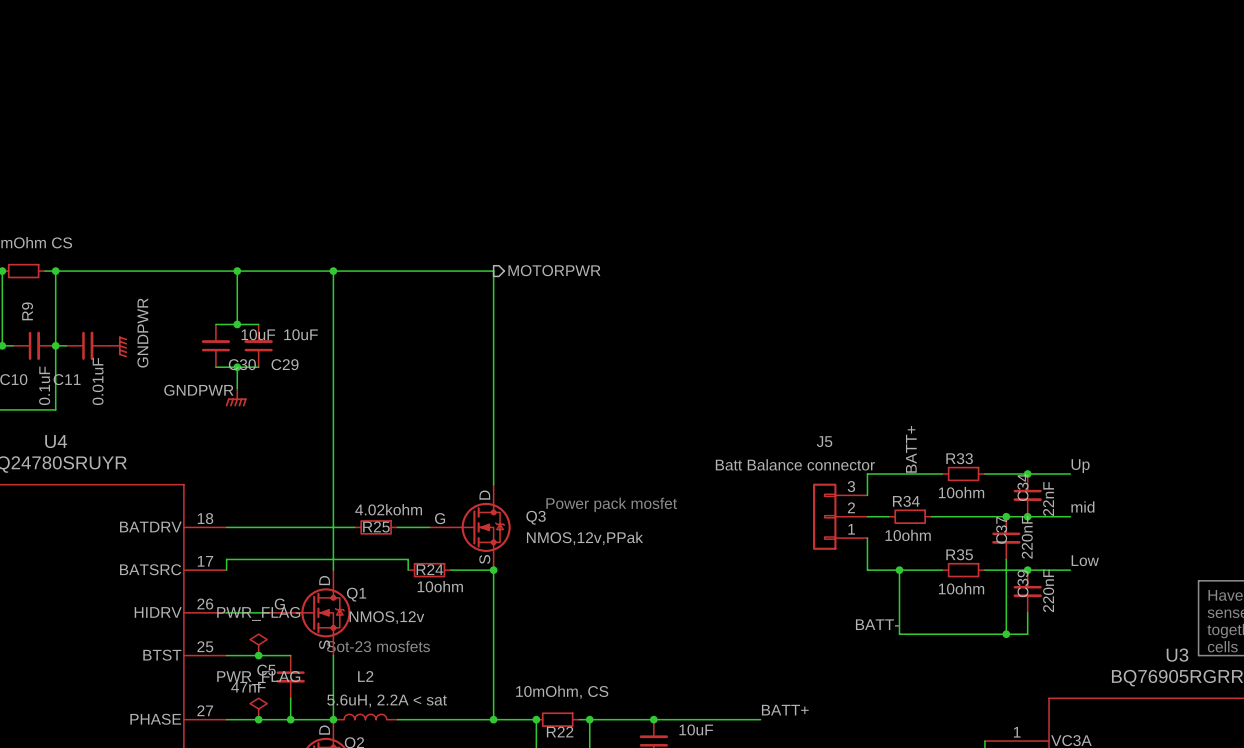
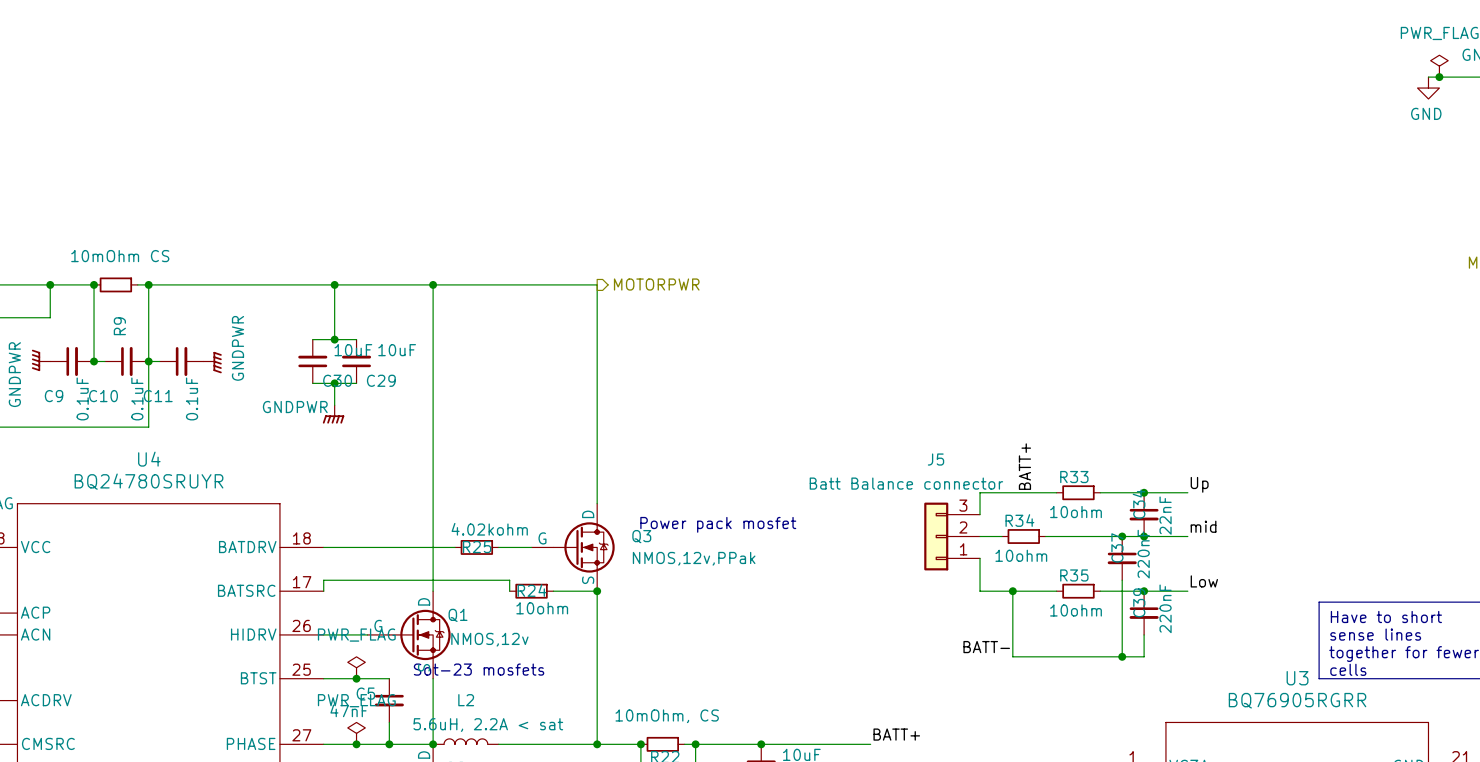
C11 value: 0.01uF (98, 381) -> 0.1uF (192, 398)

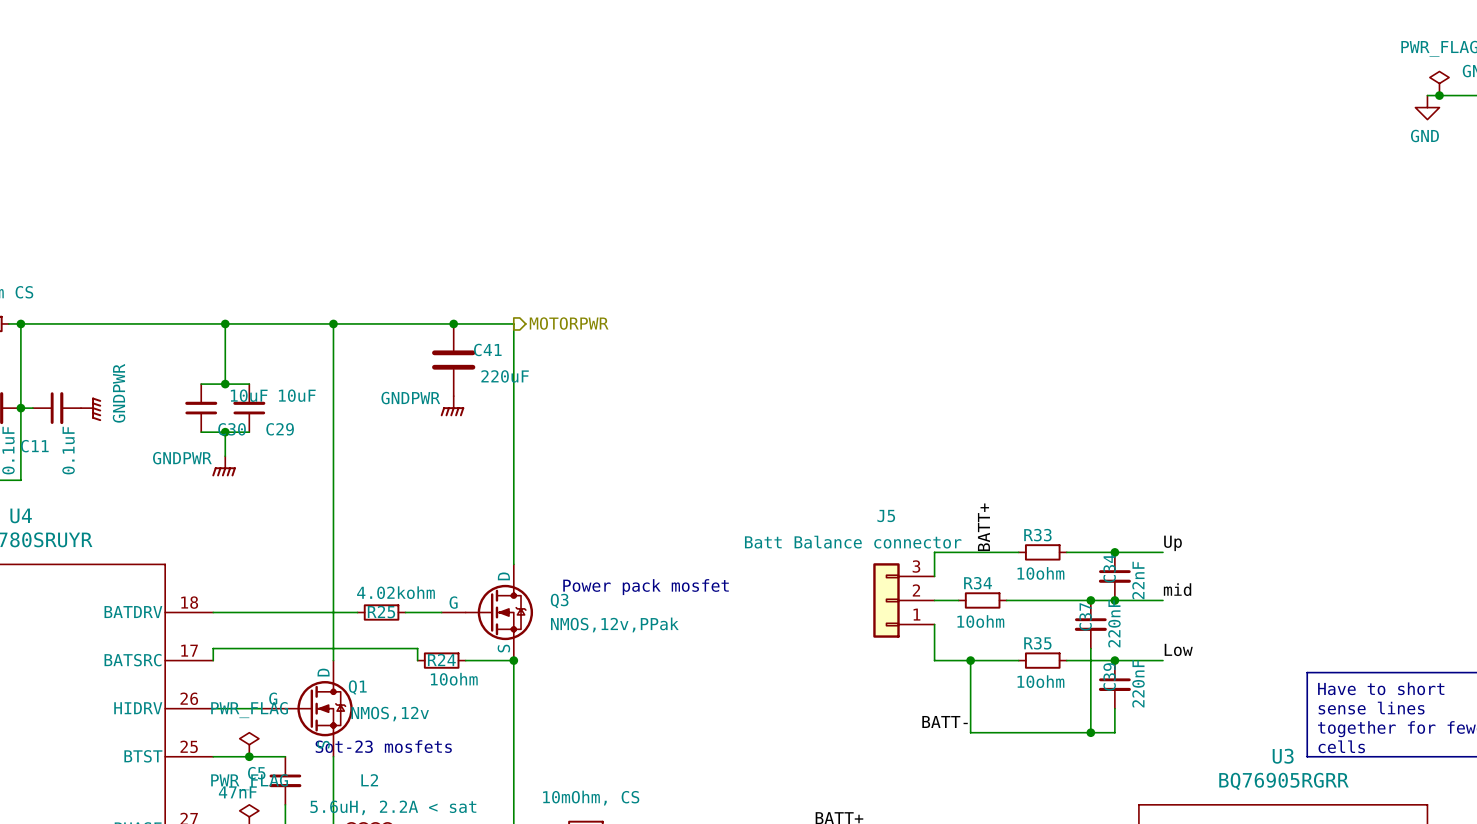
junction: none -> (453, 323)
C41: none -> 220uF (453, 360)
power symbol: none -> GNDPWR (452, 406)

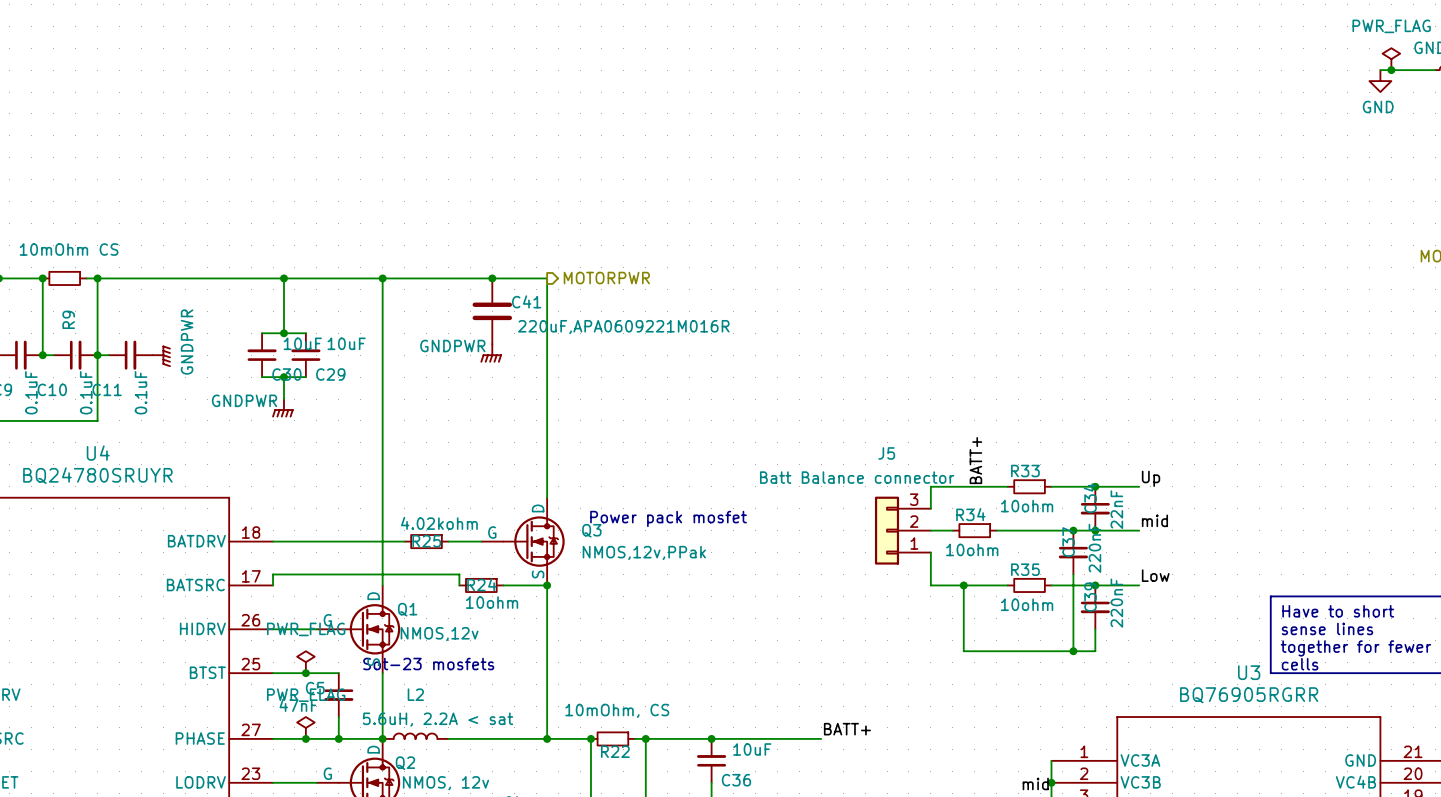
C41 value: 220uF (505, 376) -> 220uF,APA0609221M016R (623, 327)
label: BATT- (945, 721) -> none

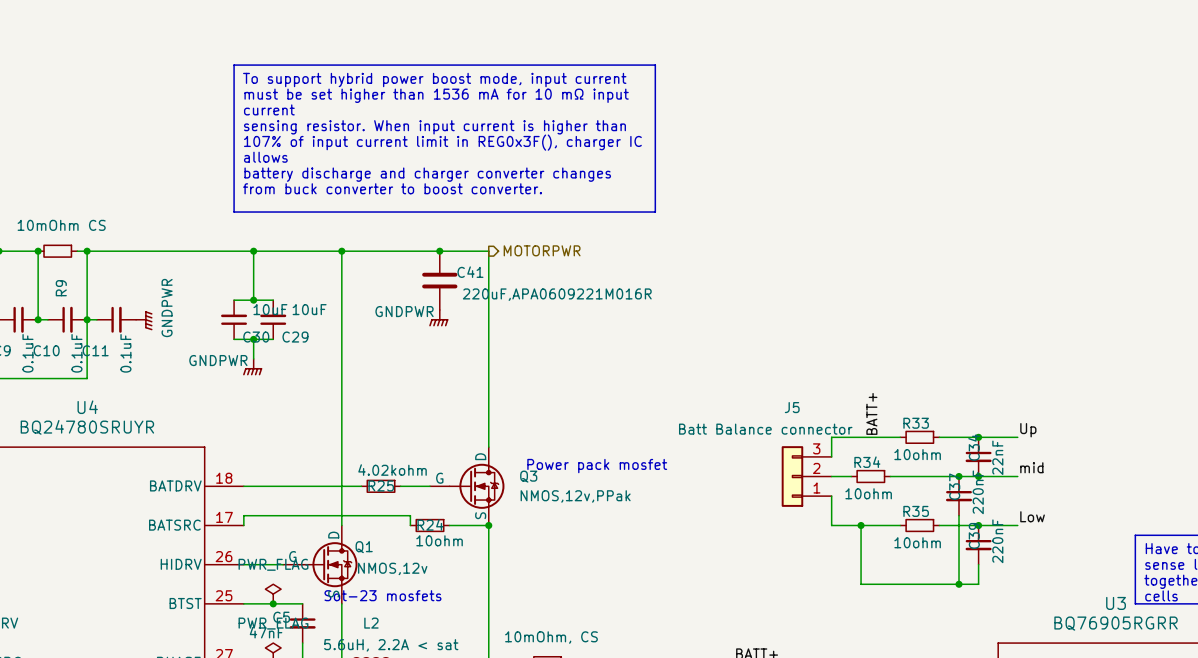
line: none -> (234, 65) (655, 65) (655, 212) (234, 212) (234, 65)
text: none -> To support hybrid power boost mode, input current (434, 80)
text: none -> must be set higher than 1536 mA for 10 mΩ input (436, 95)
text: none -> current (269, 109)
text: none -> sensing resistor. When input current is higher than (434, 127)
text: none -> 107% of input current limit in REG0x3F(), charger IC (442, 142)
text: none -> allows (265, 157)
text: none -> battery discharge and charger converter changes (427, 174)
text: none -> from buck converter to boost converter. (392, 188)

